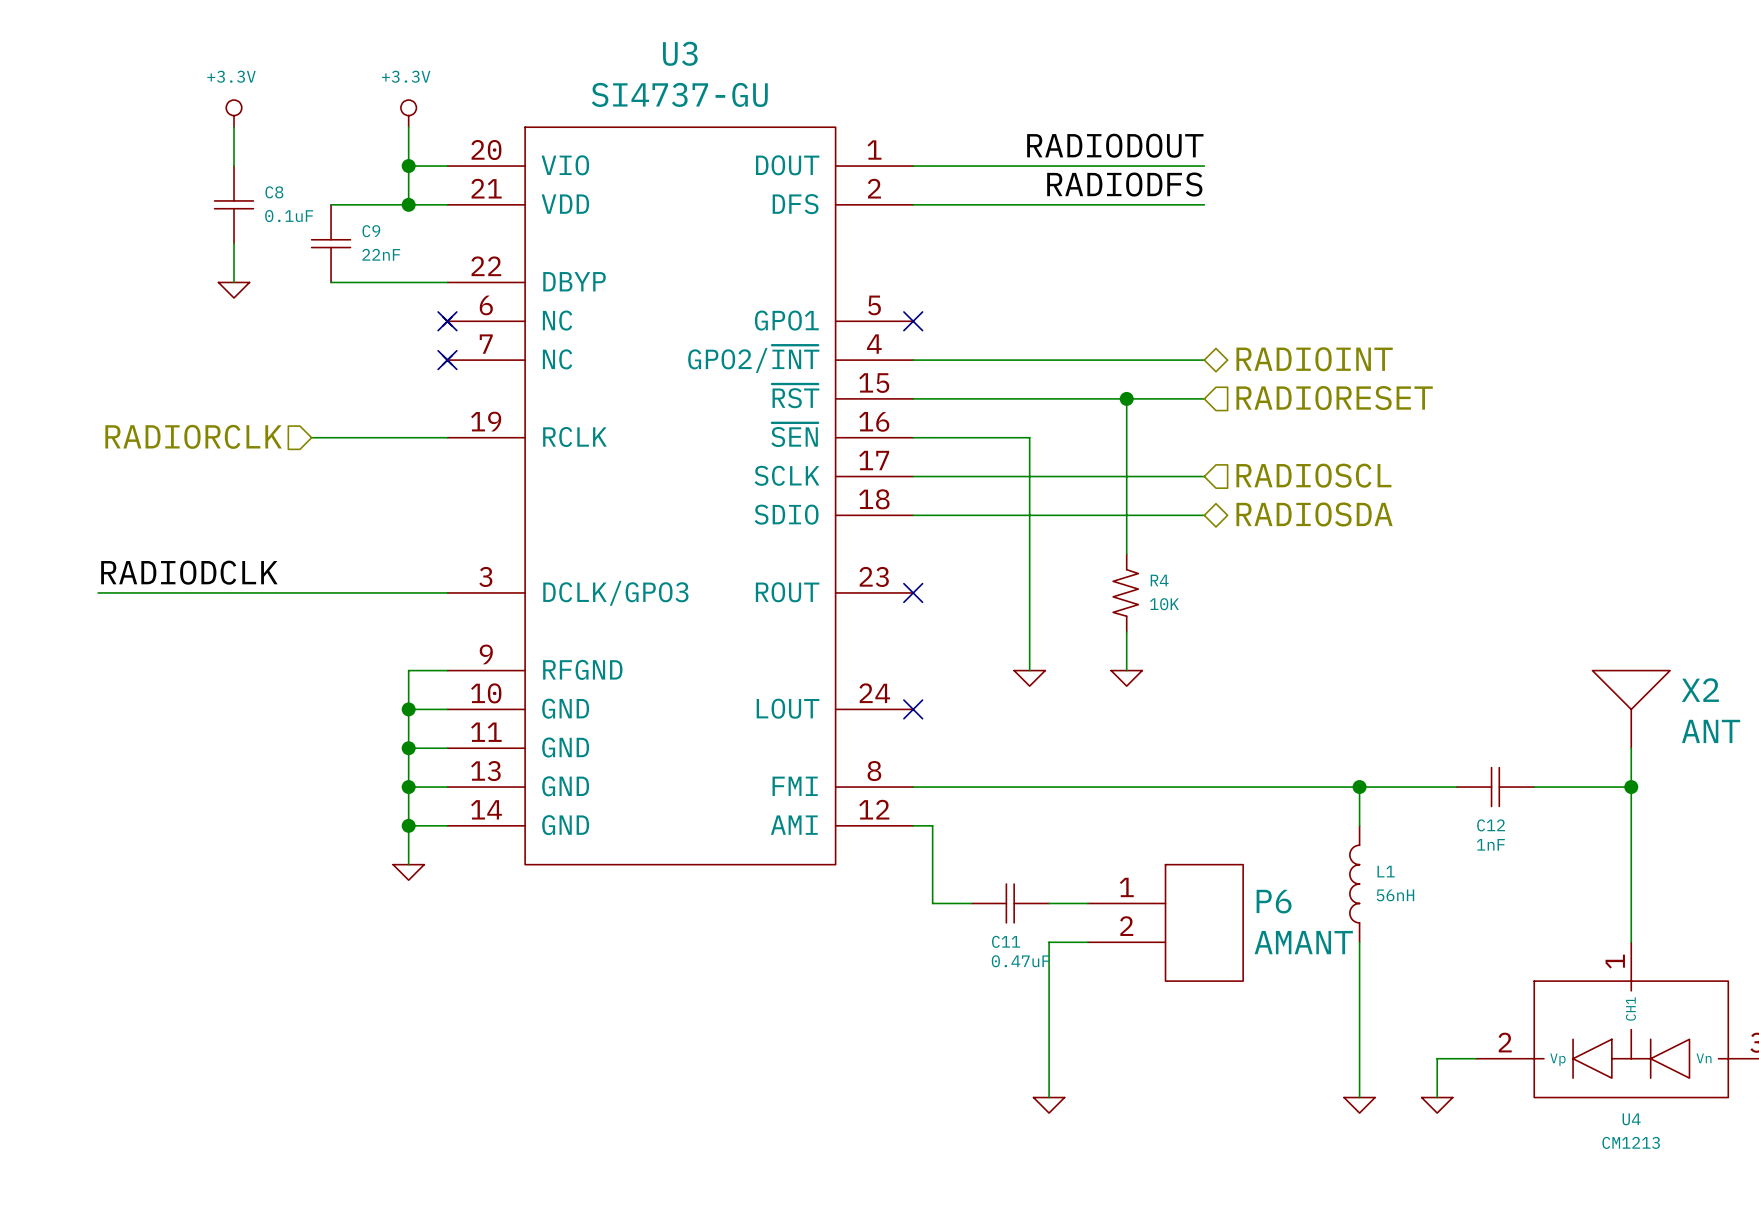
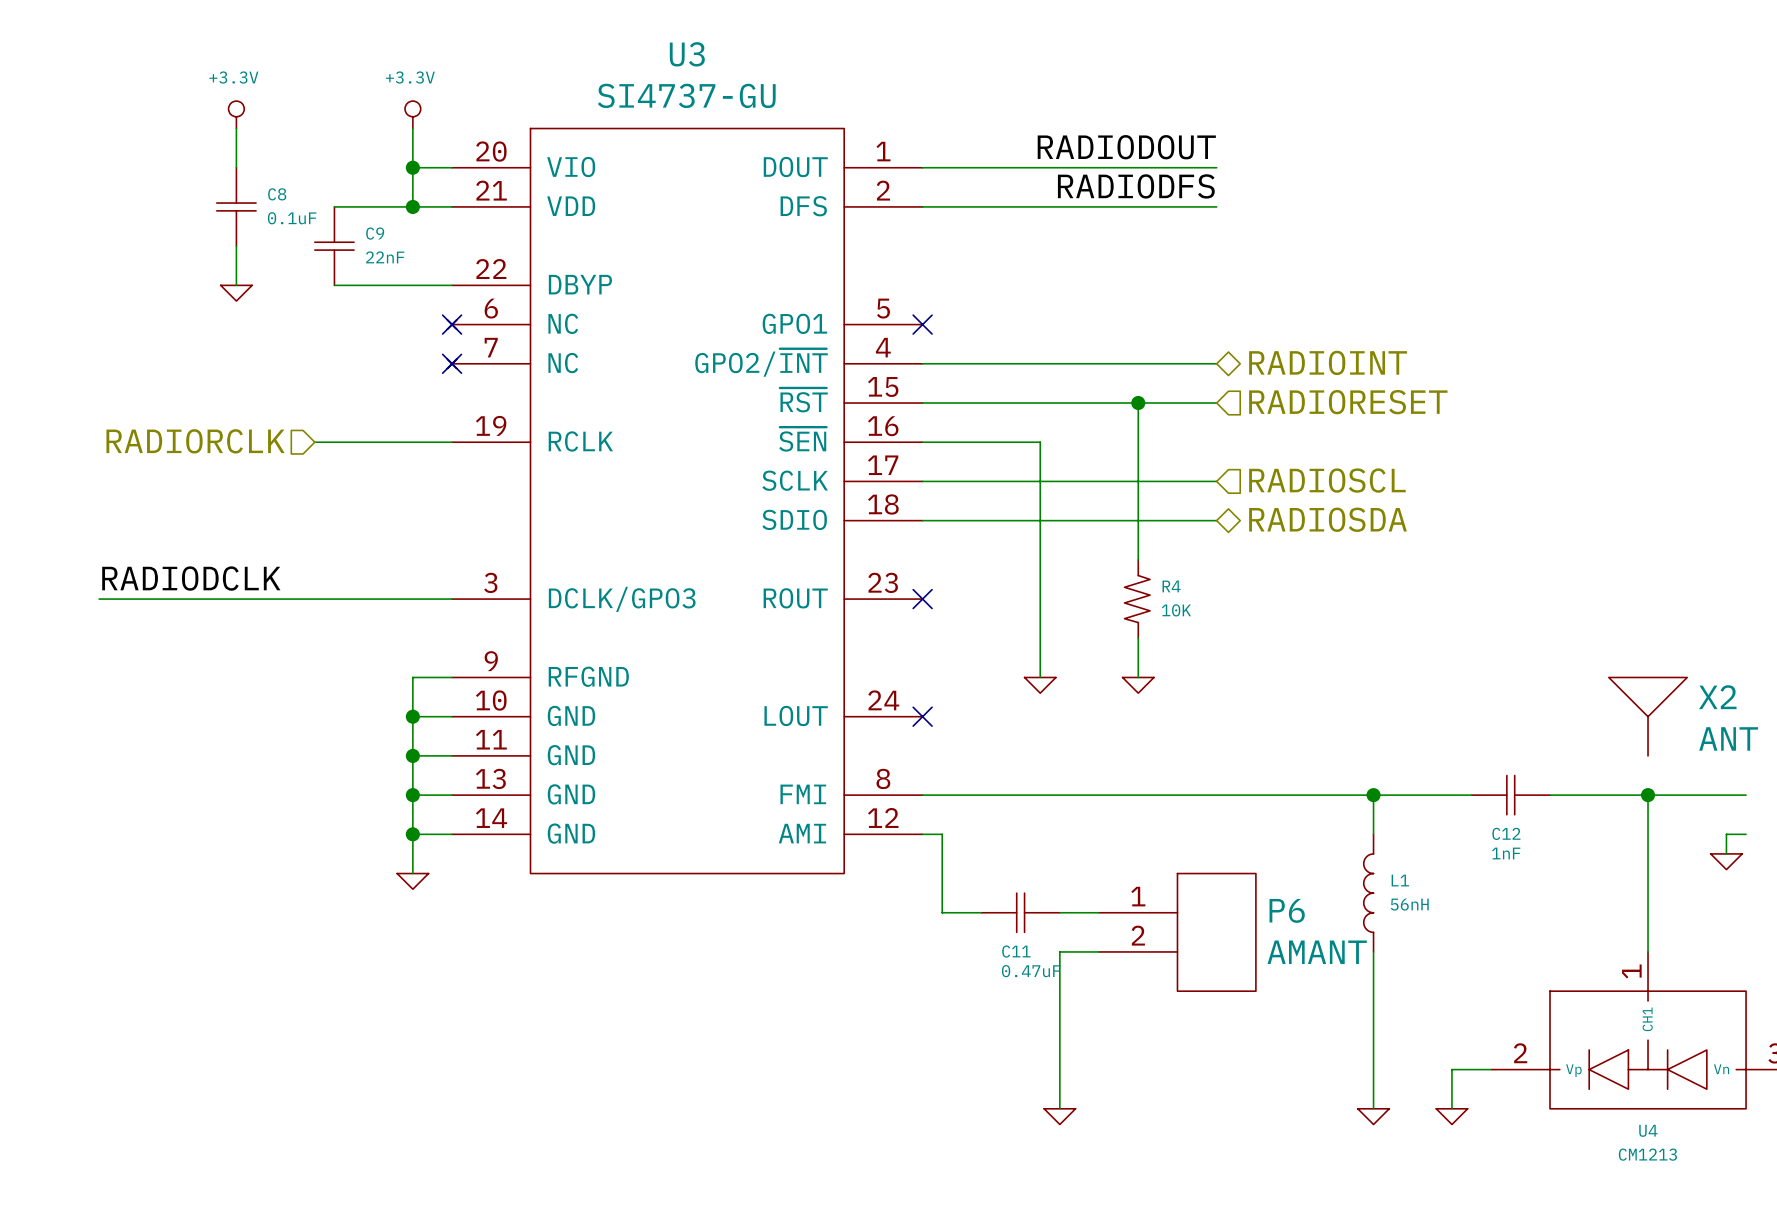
wire: (1631, 748) (1631, 787) -> (1746, 795) (1648, 795)
wire: none -> (1746, 834) (1726, 834) (1726, 853)
power symbol: none -> (1726, 861)

